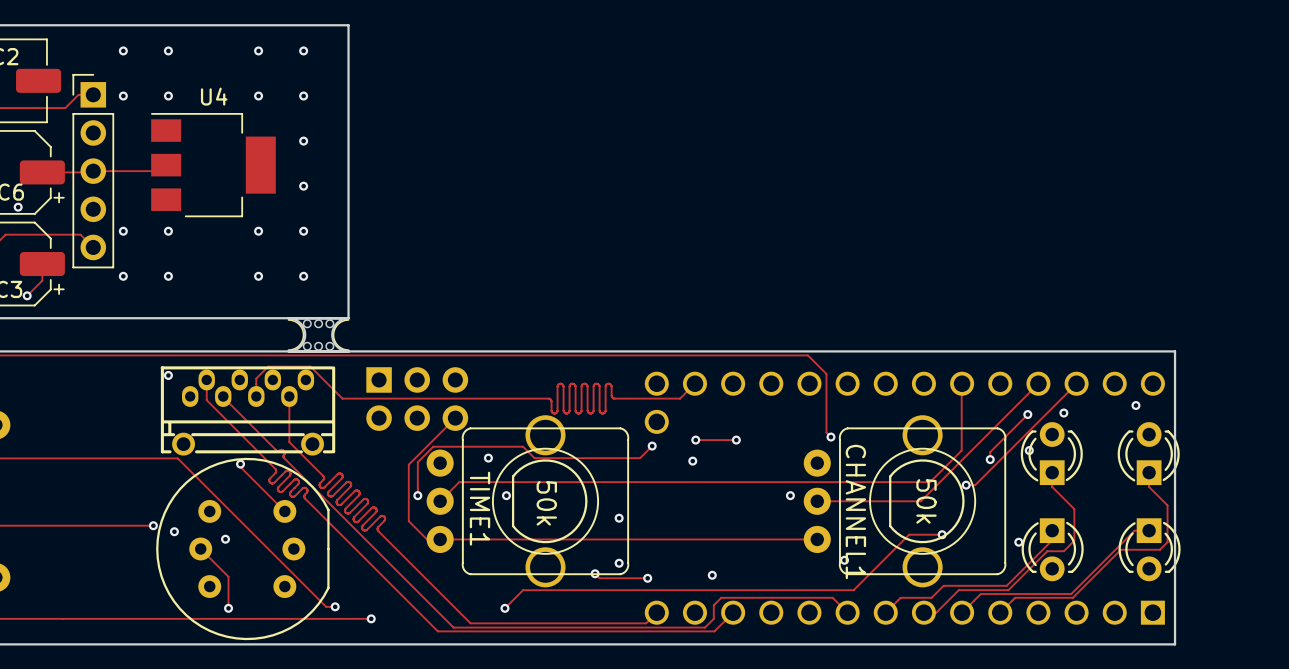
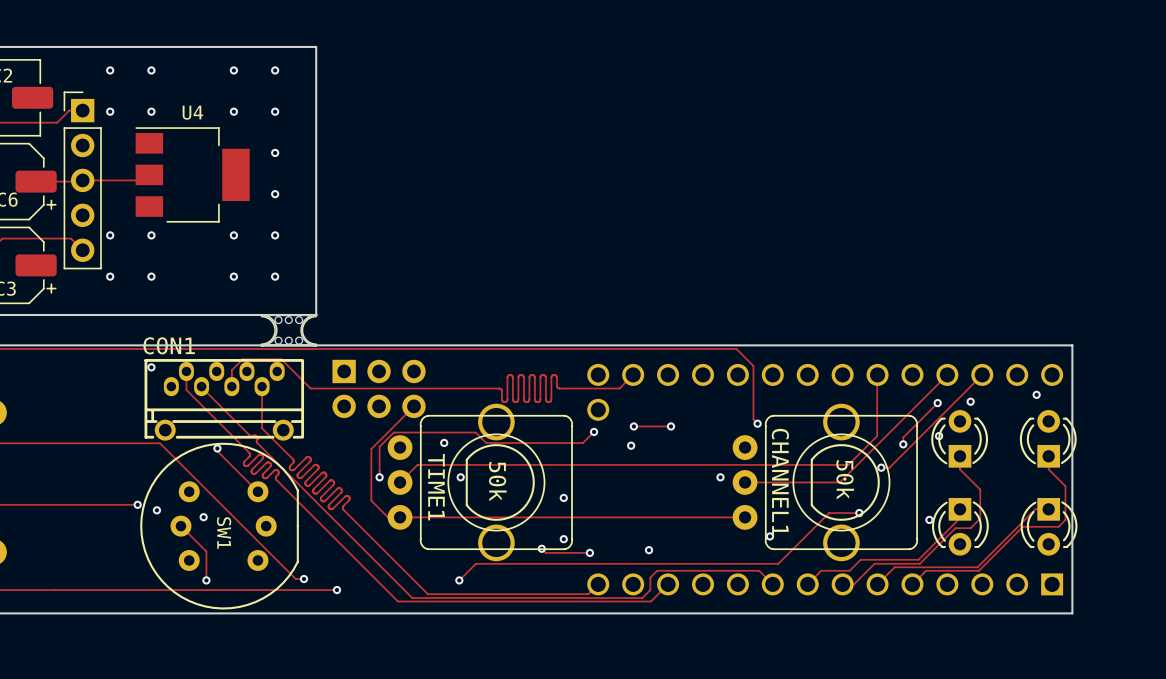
via: (18, 207) -> none
track: (42, 264) (42, 280) (27, 295) -> none
via: (27, 295) -> none
CON1 name: none -> CON1 (169, 345)
SW1 name: none -> SW1 (224, 532)

